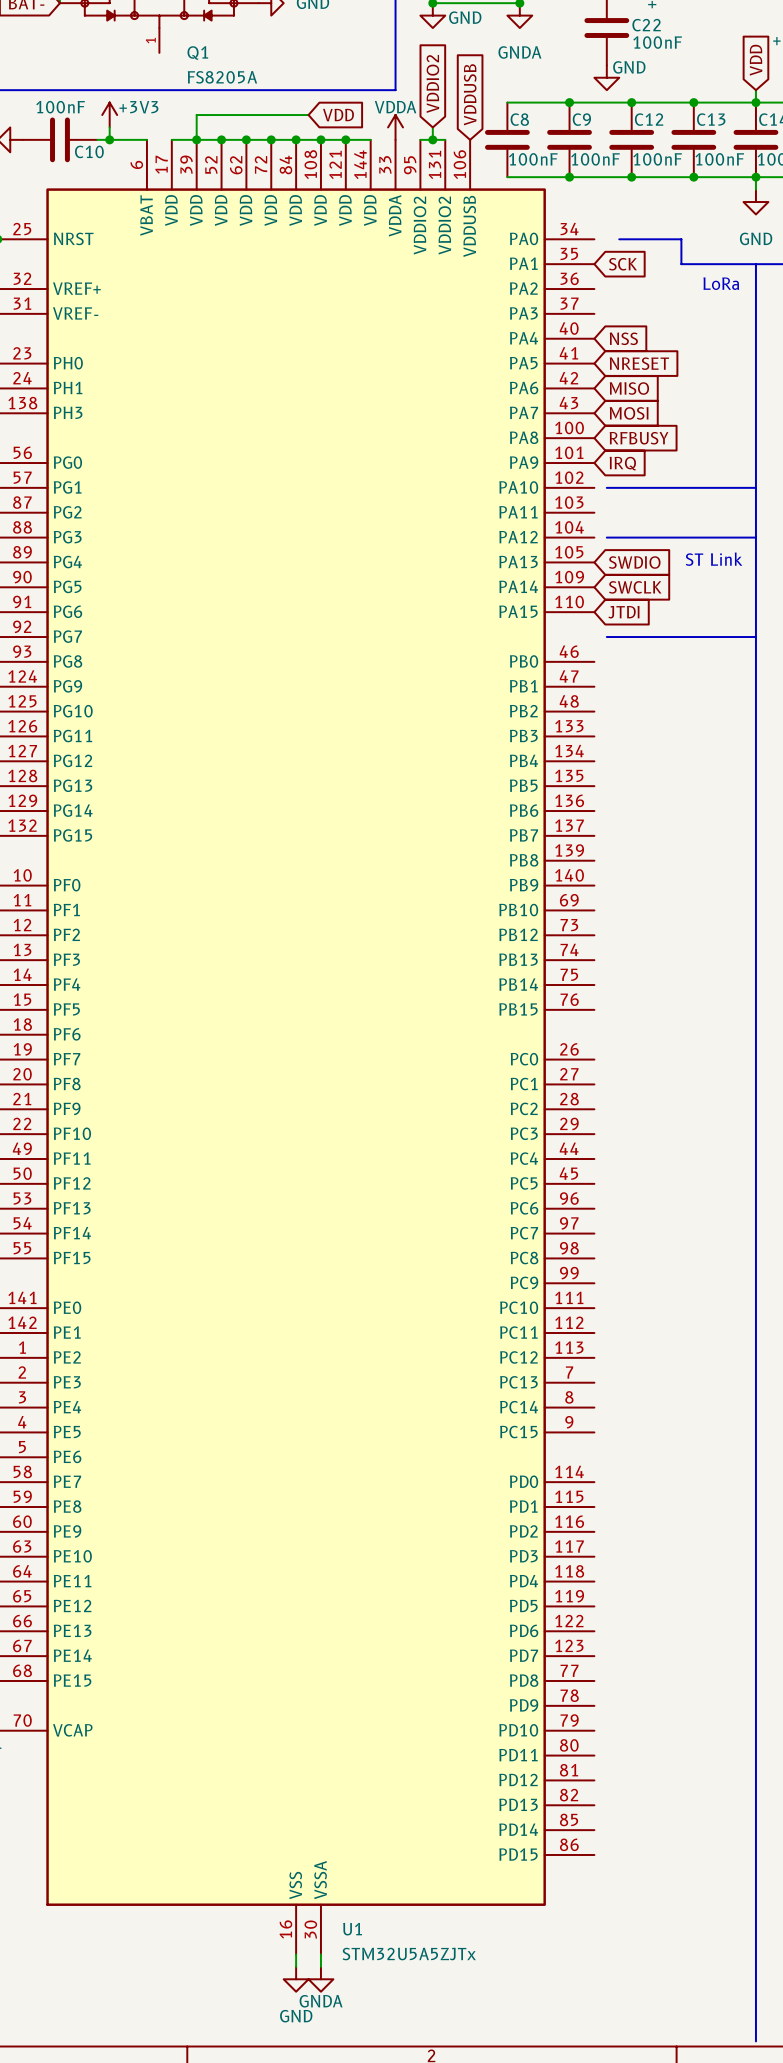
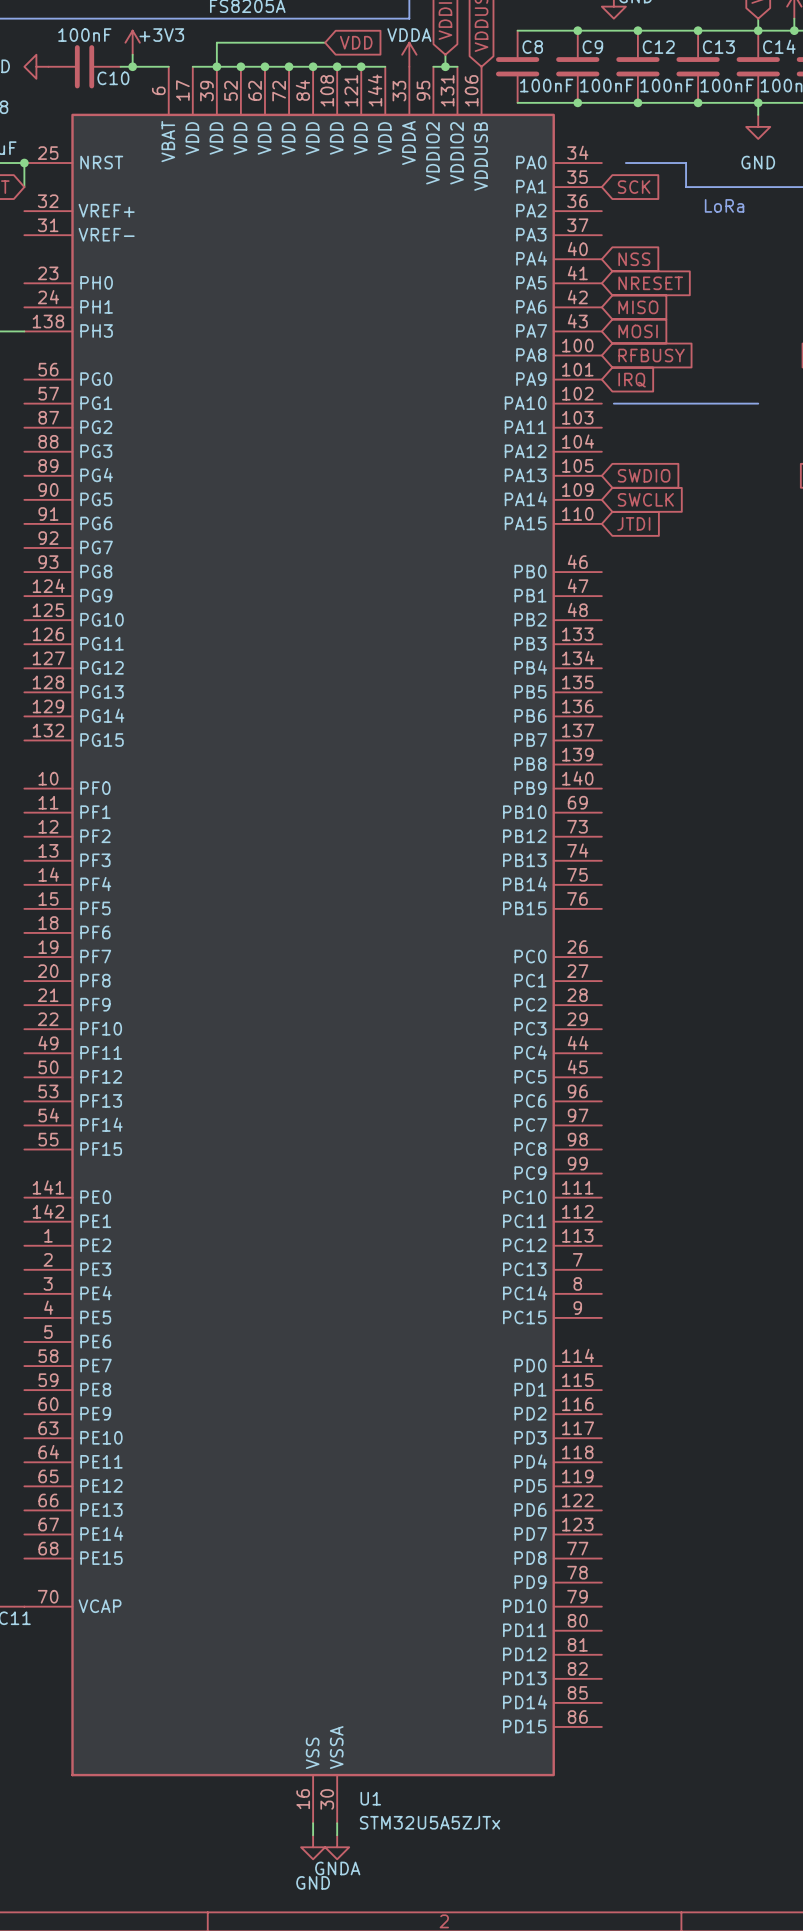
line: (755, 264) (755, 2041) -> none
line: (606, 537) (755, 537) -> none
text: ST Link (714, 559) -> none
line: (606, 637) (755, 637) -> none

